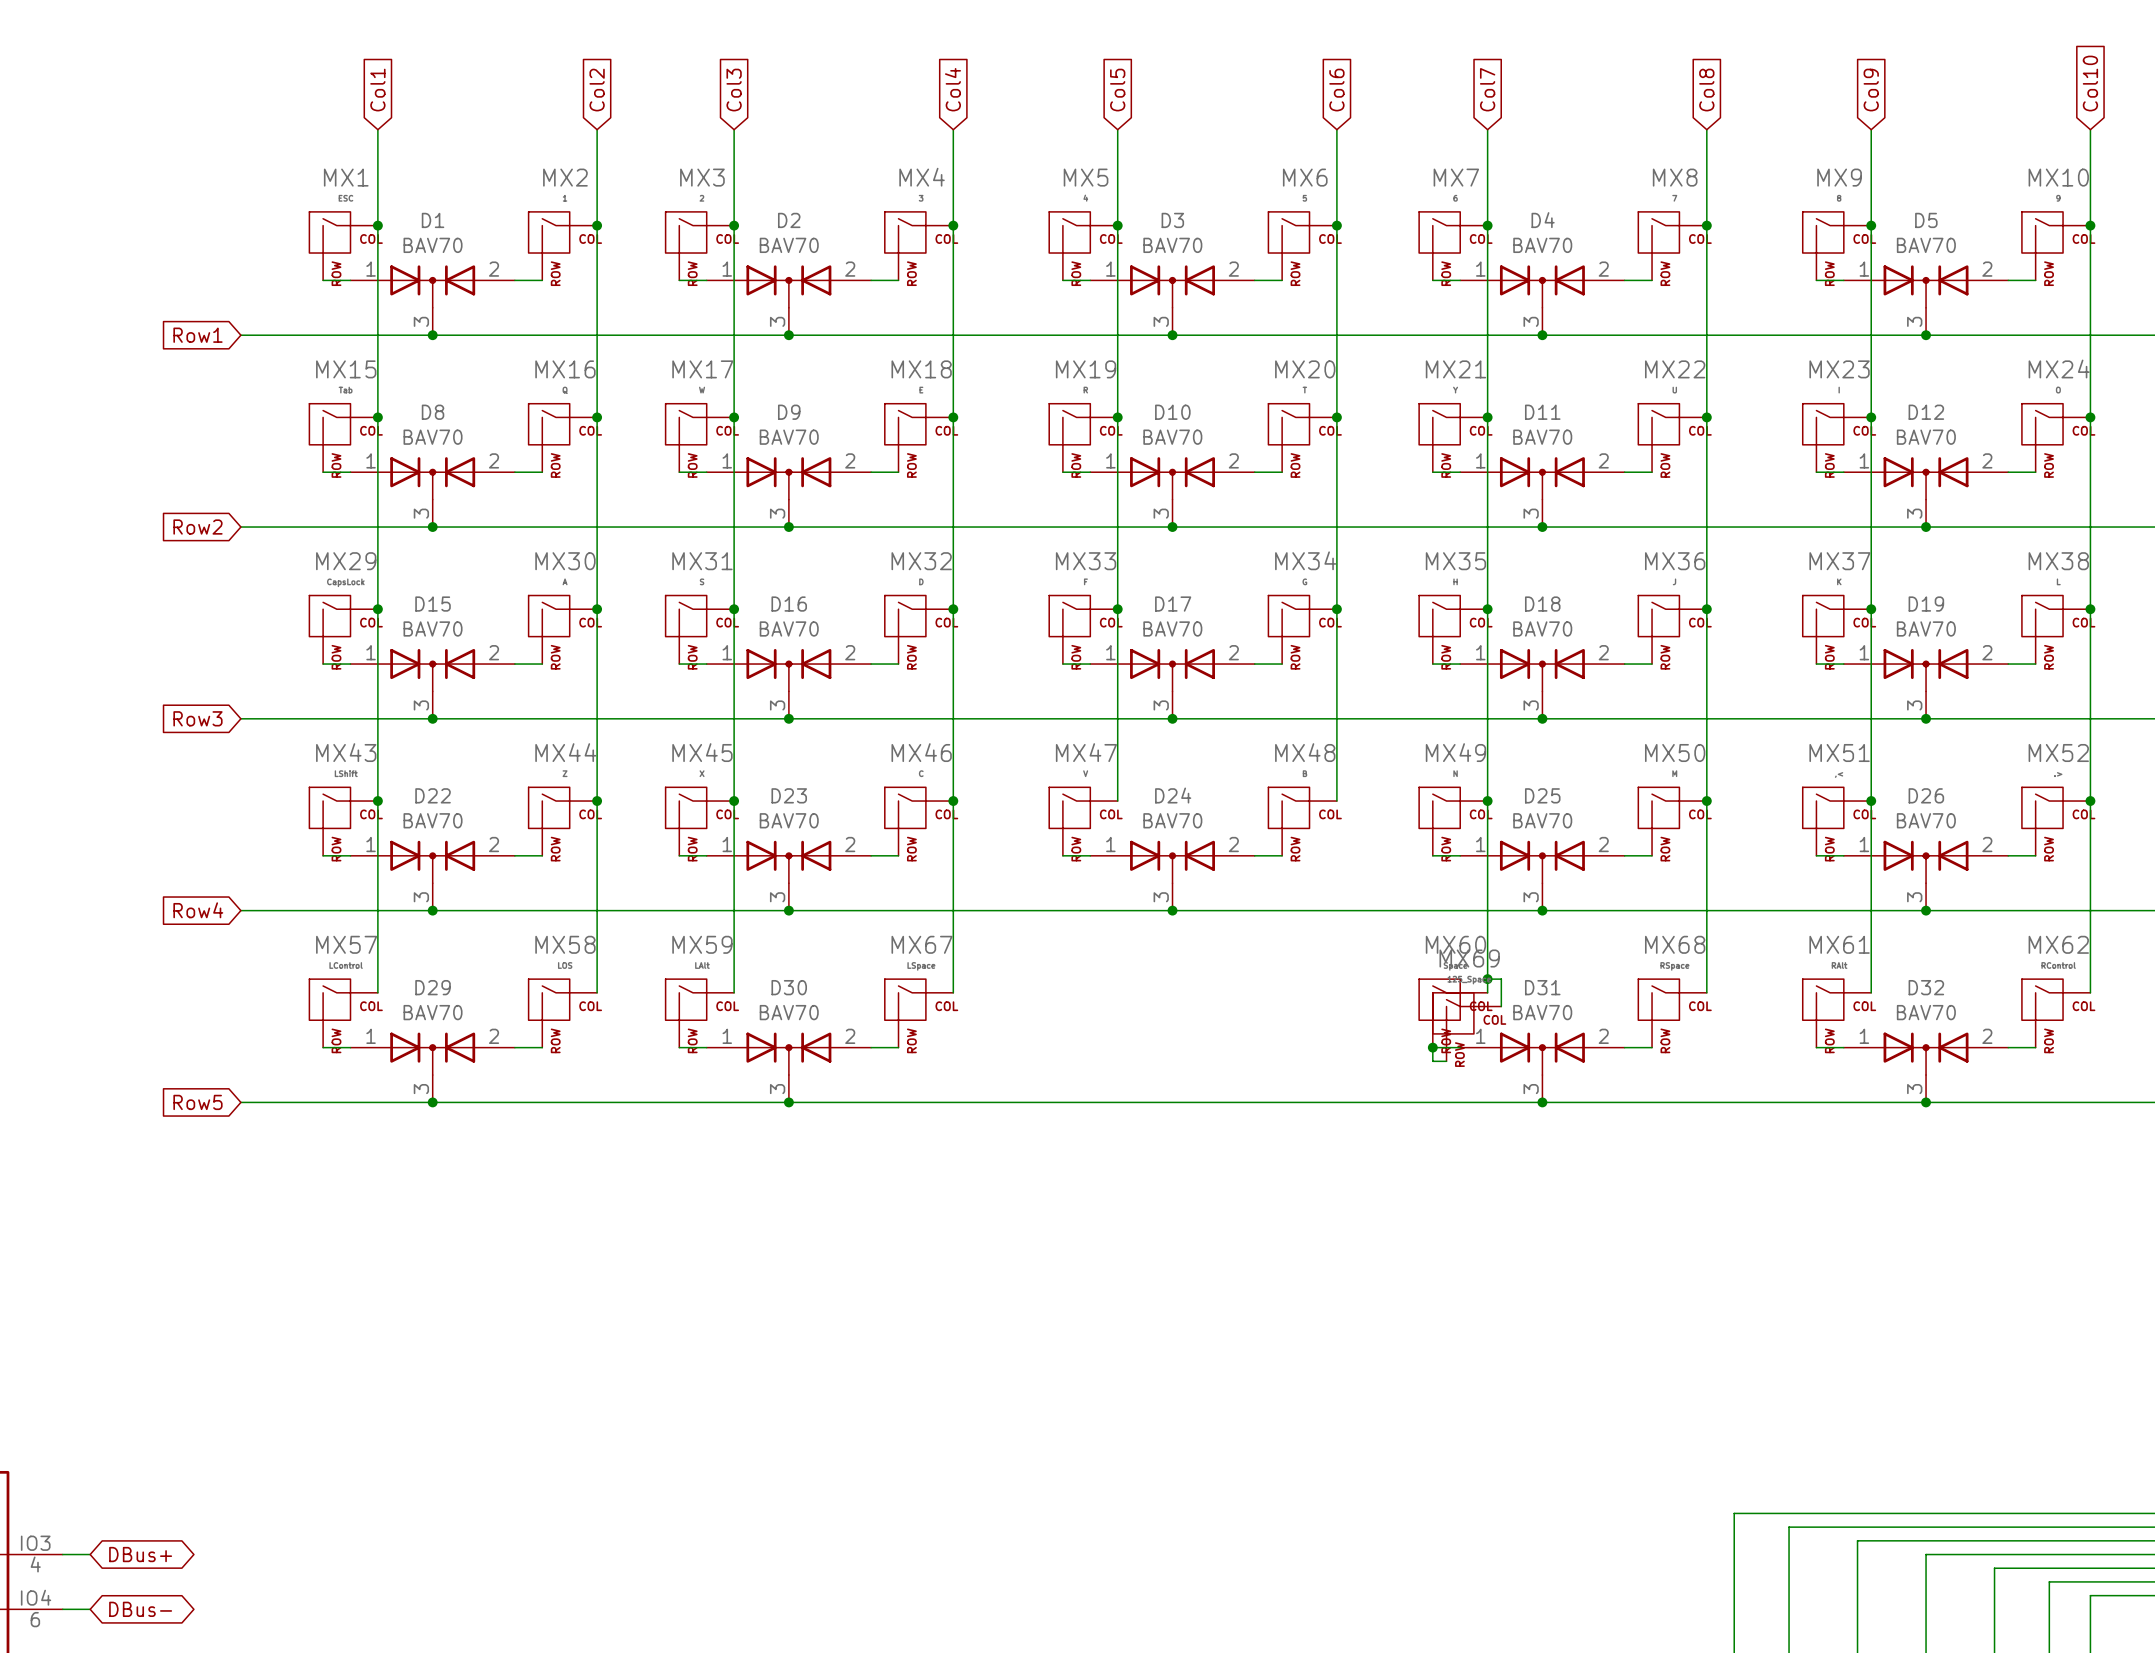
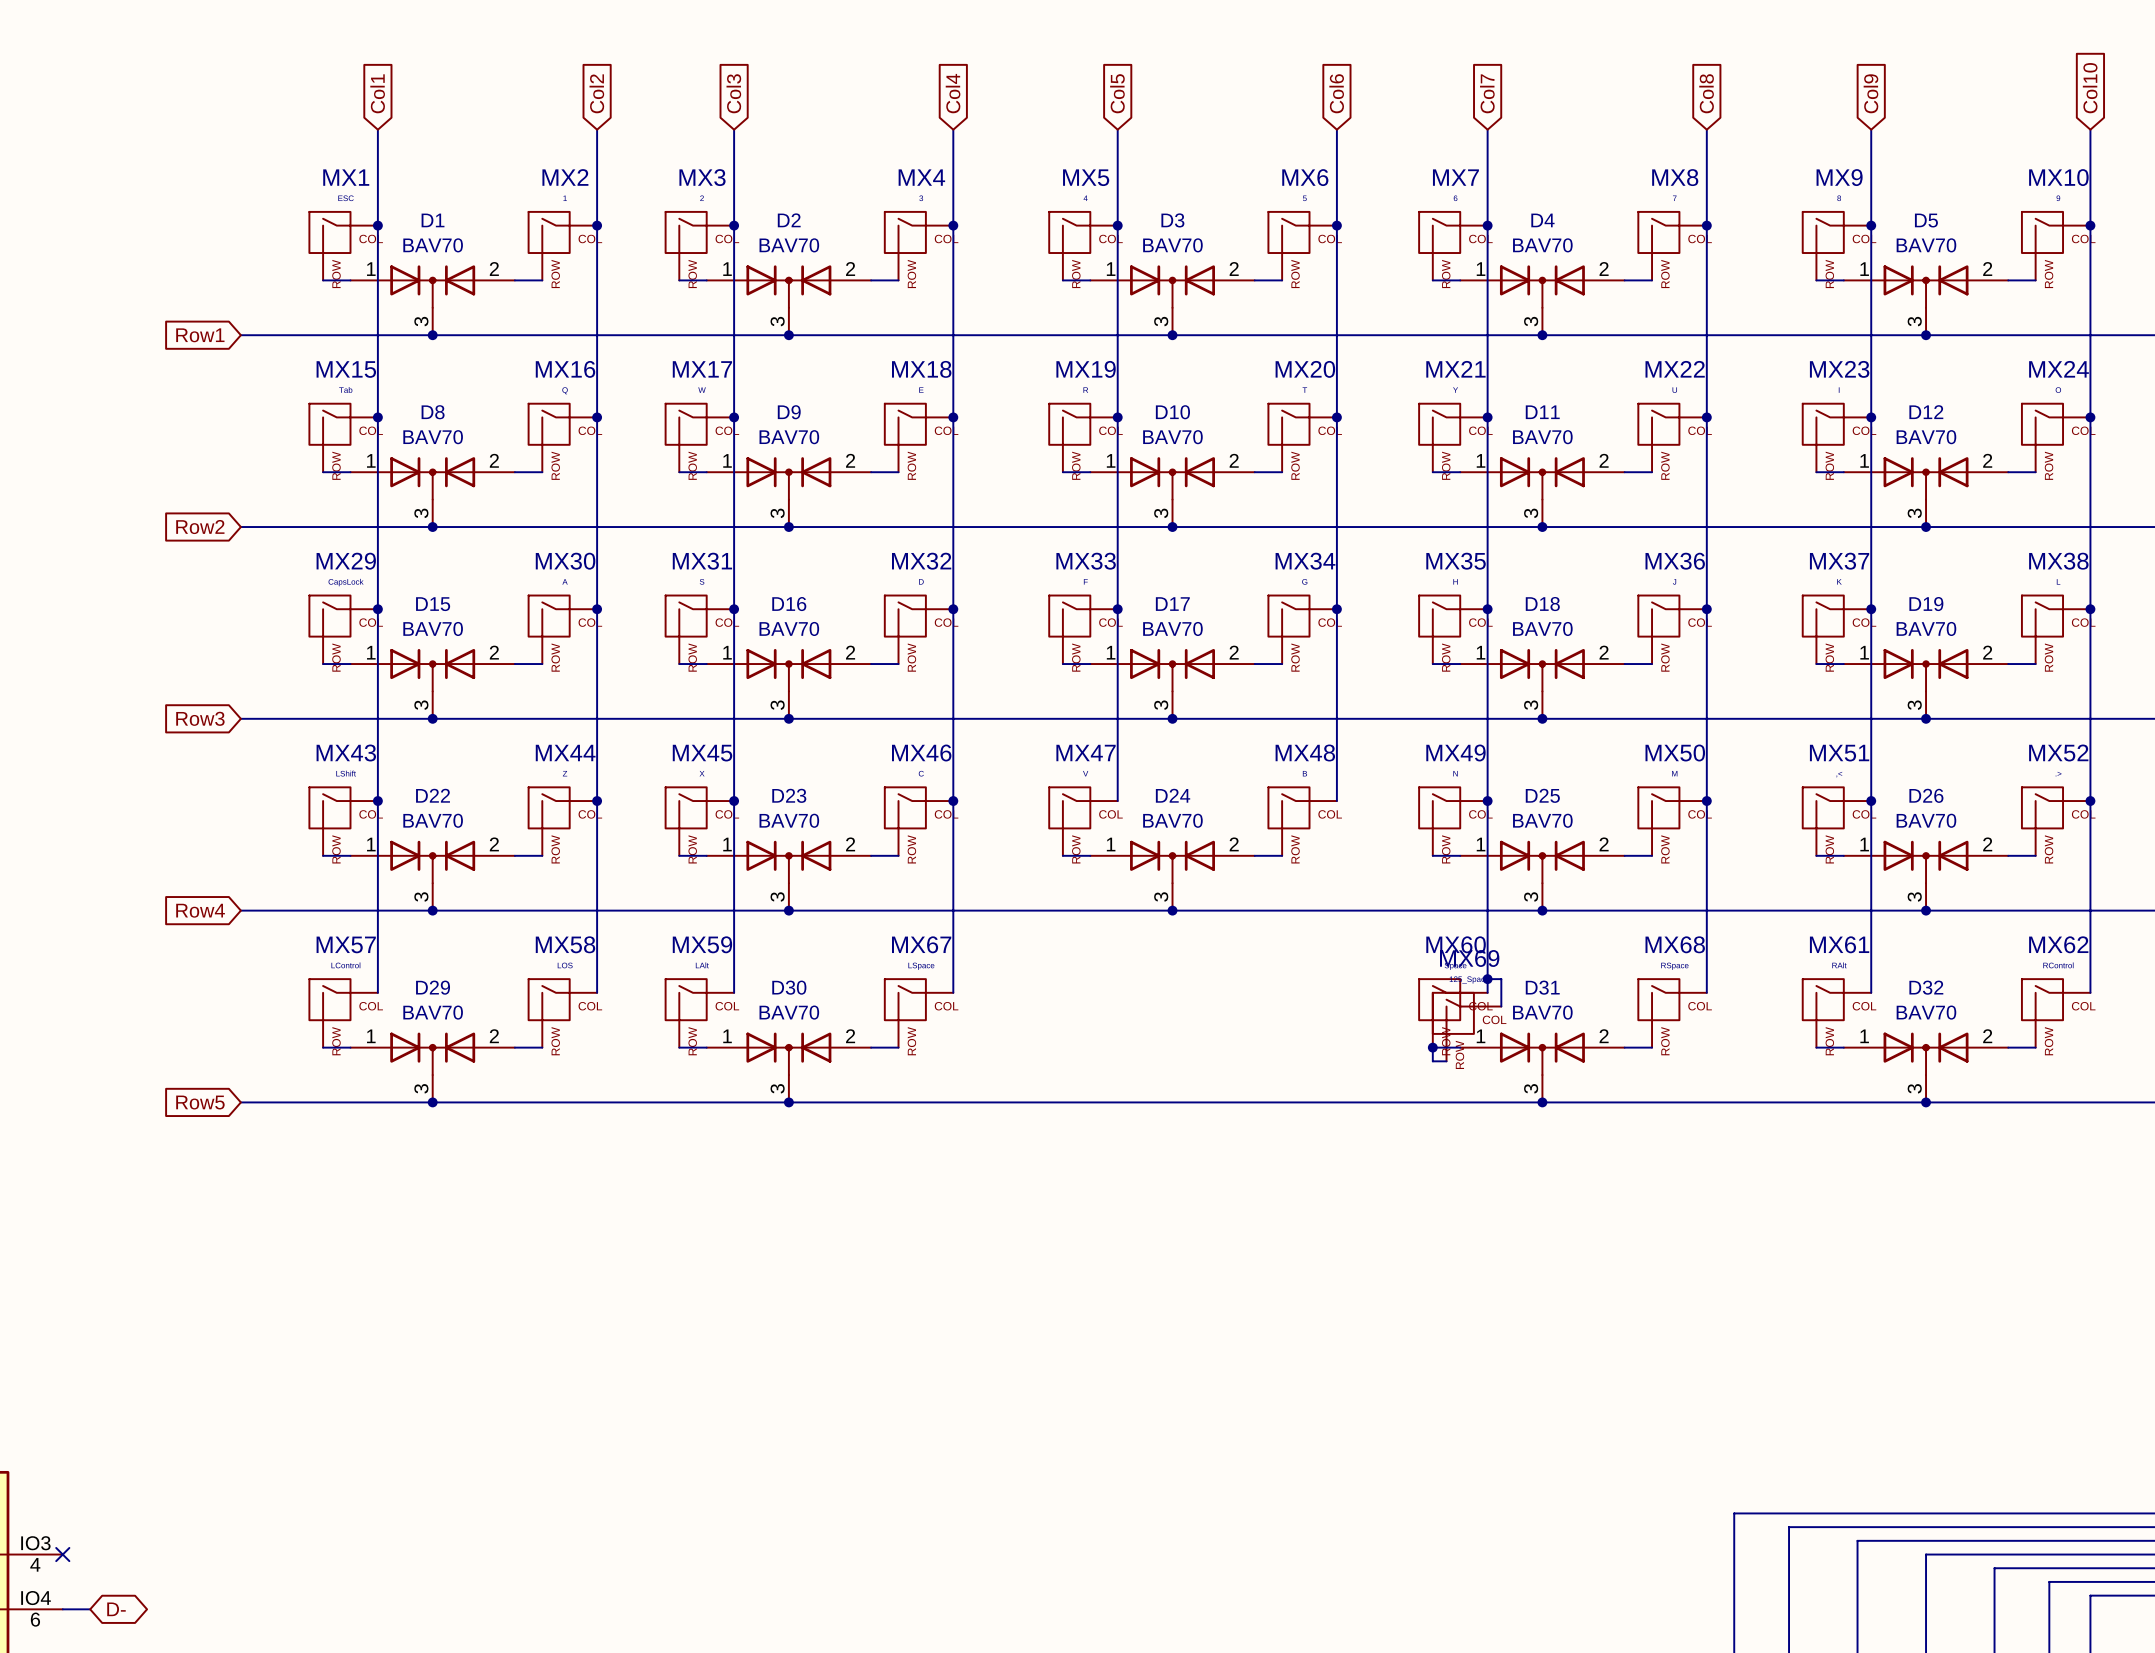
wire: (62, 1554) (90, 1554) -> none
no-connect mark: none -> (62, 1554)
global label: DBus+ (140, 1554) -> none
global label: DBus- (140, 1609) -> D- (116, 1609)

